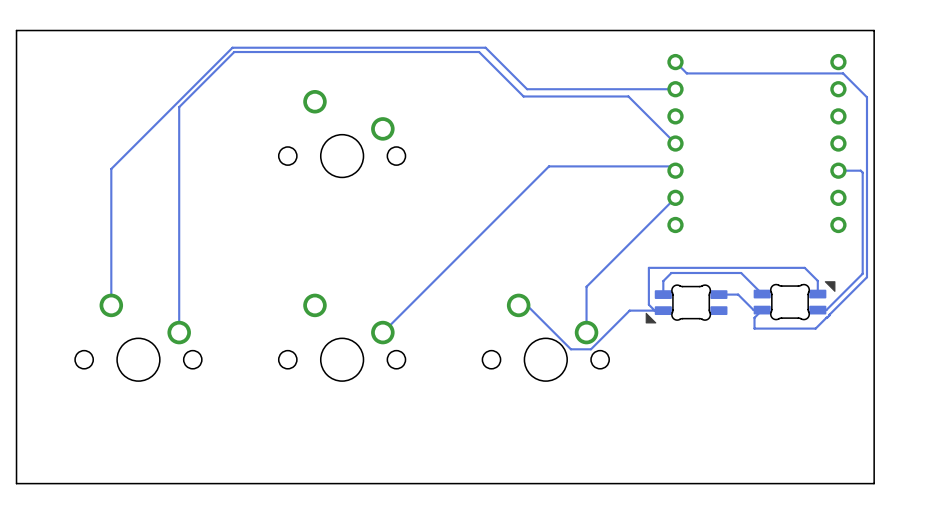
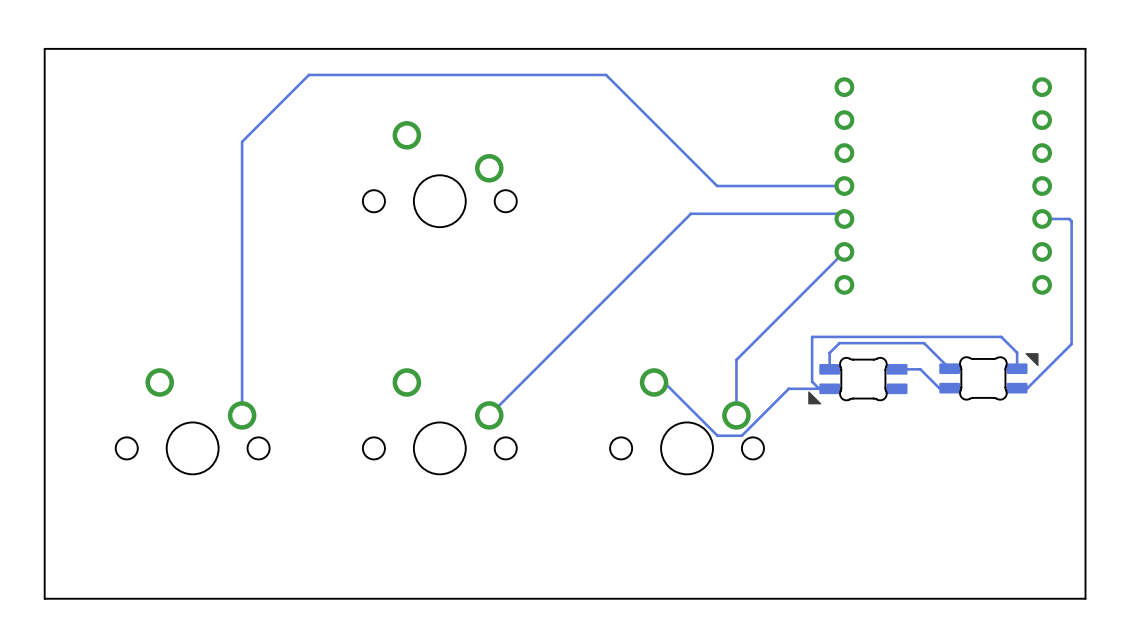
track: (675, 62) (686, 73) (843, 73) (866, 97) (866, 277) (815, 328) (754, 328) (754, 317) (762, 310) -> none
track: (675, 89) (527, 89) (485, 47) (232, 47) (111, 168) (111, 305) -> none
track: (523, 96) (628, 96) (675, 143) -> (660, 128) (717, 186) (844, 186)

